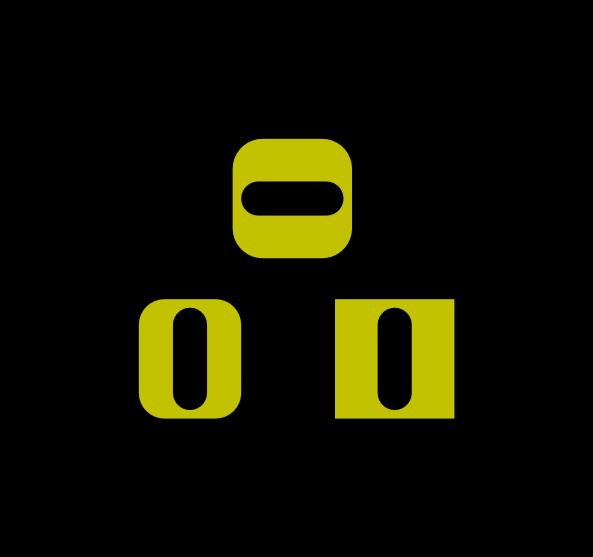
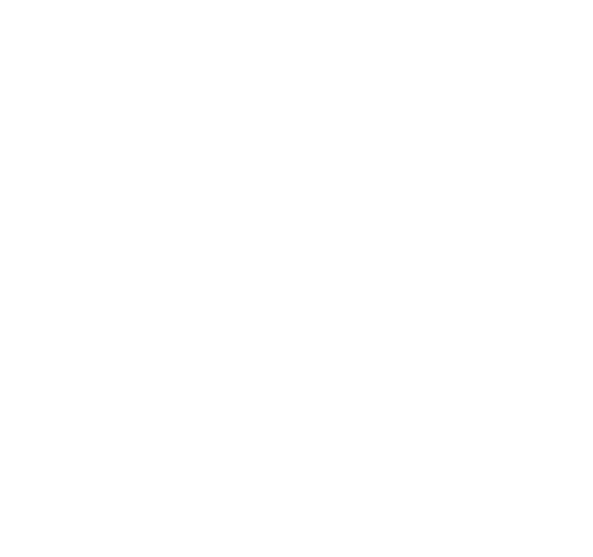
part: (296, 278) -> none

